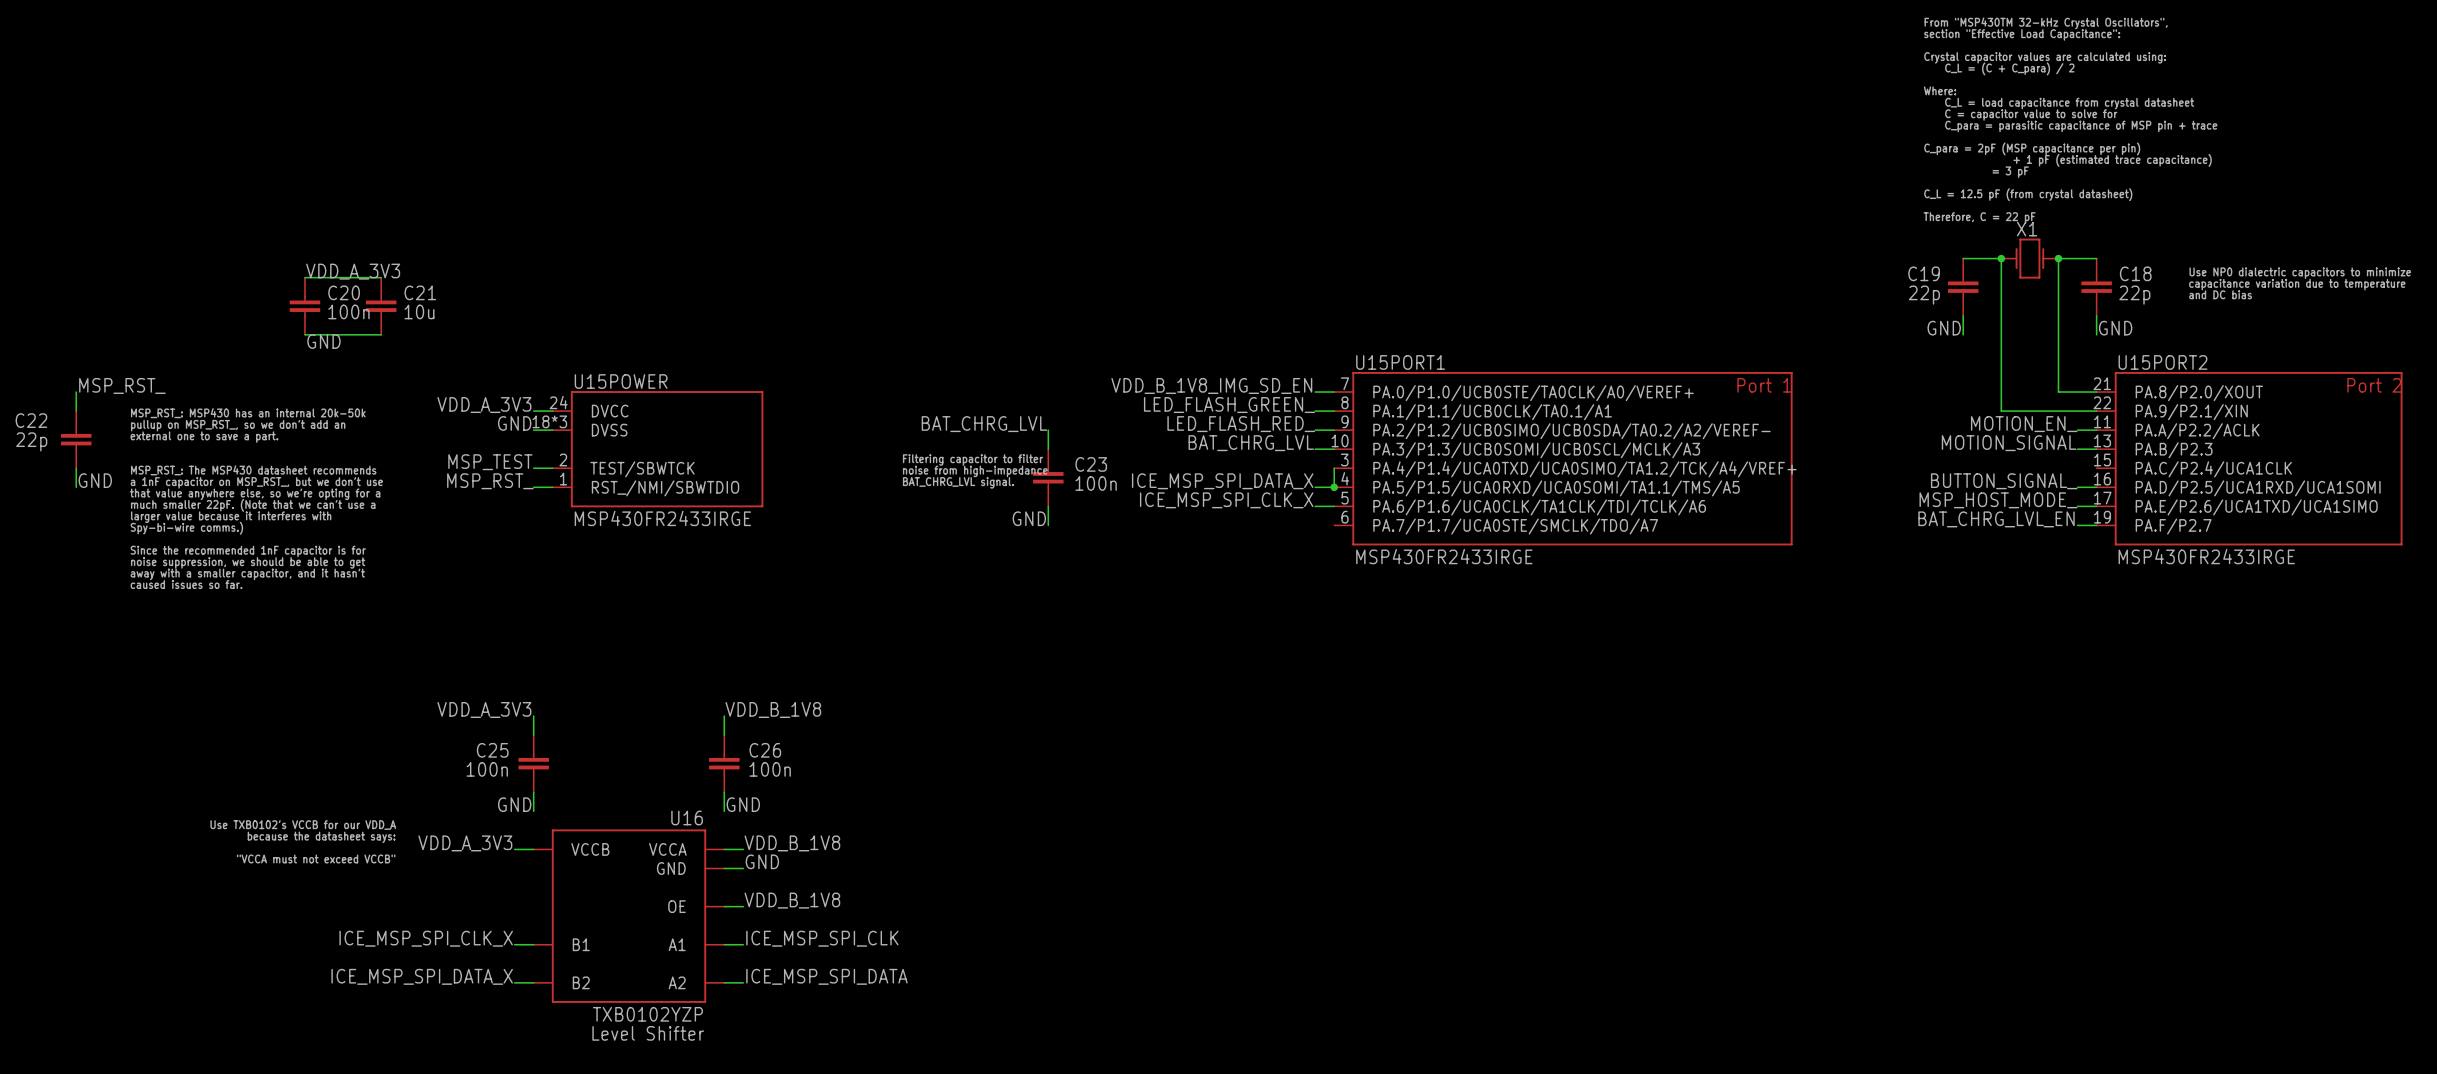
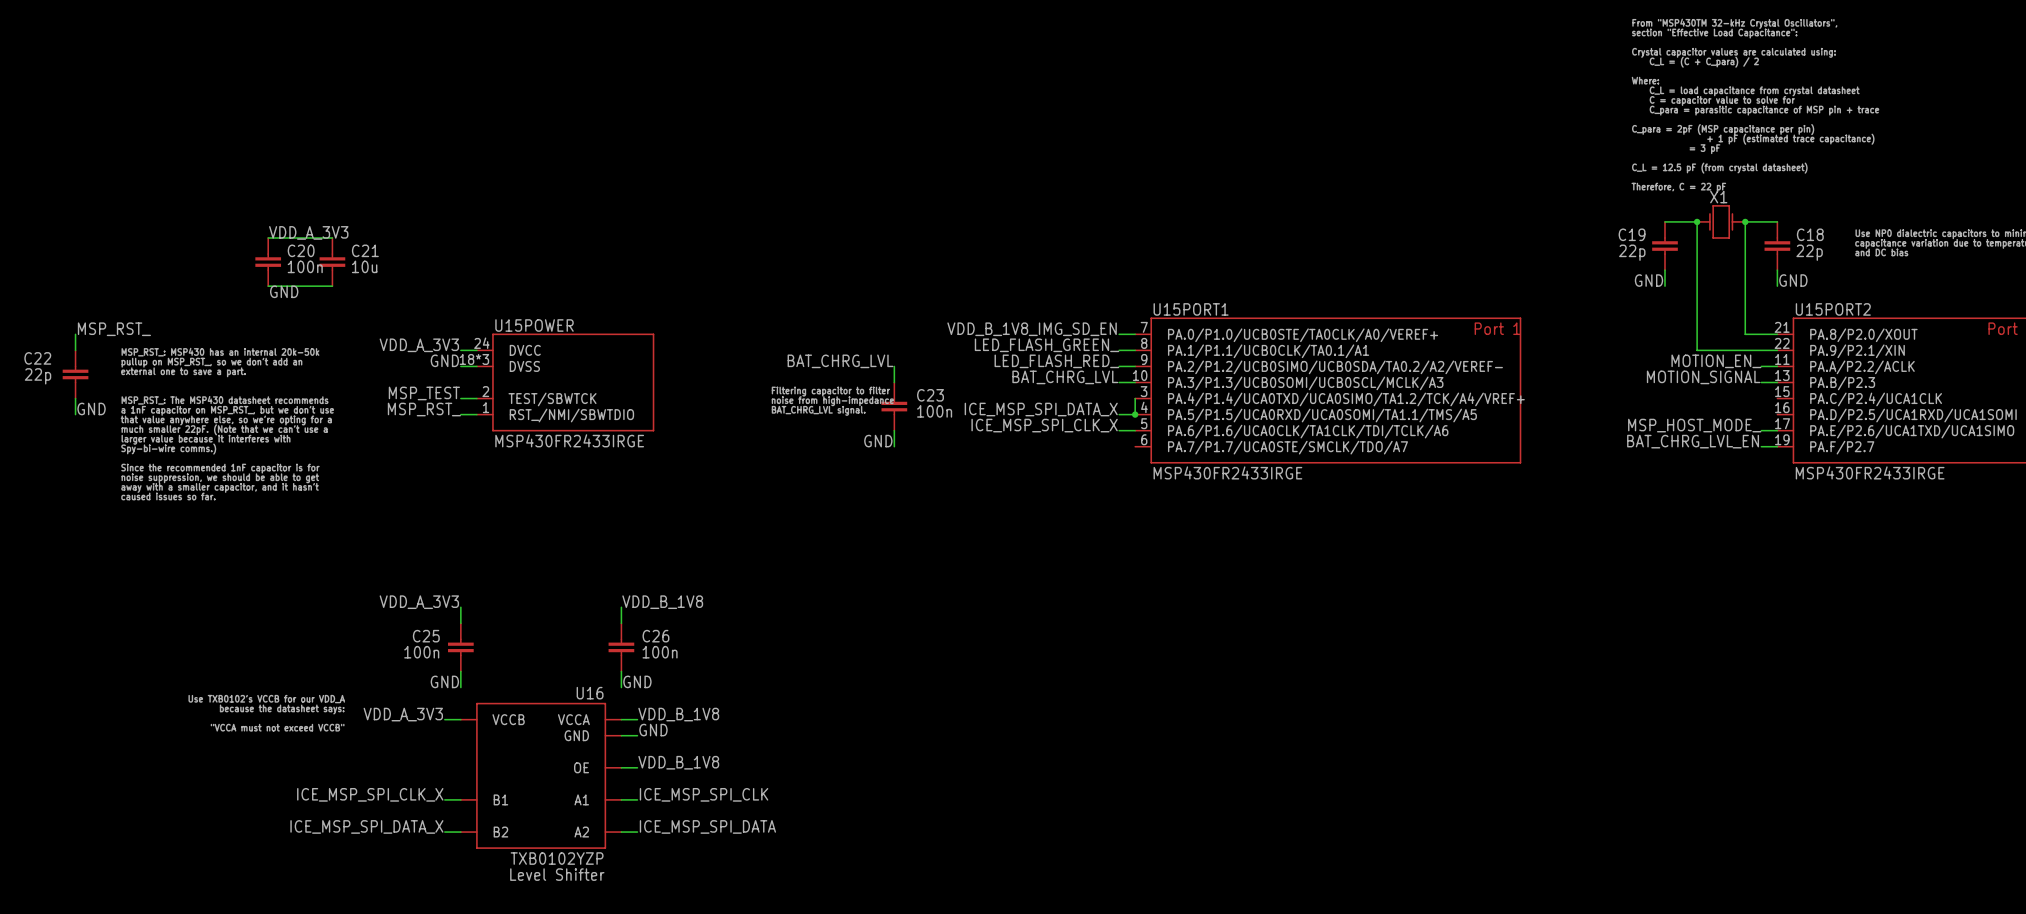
label: BUTTON_SIGNAL_ (2004, 481) -> none
wire: (2077, 487) (2096, 487) -> none

